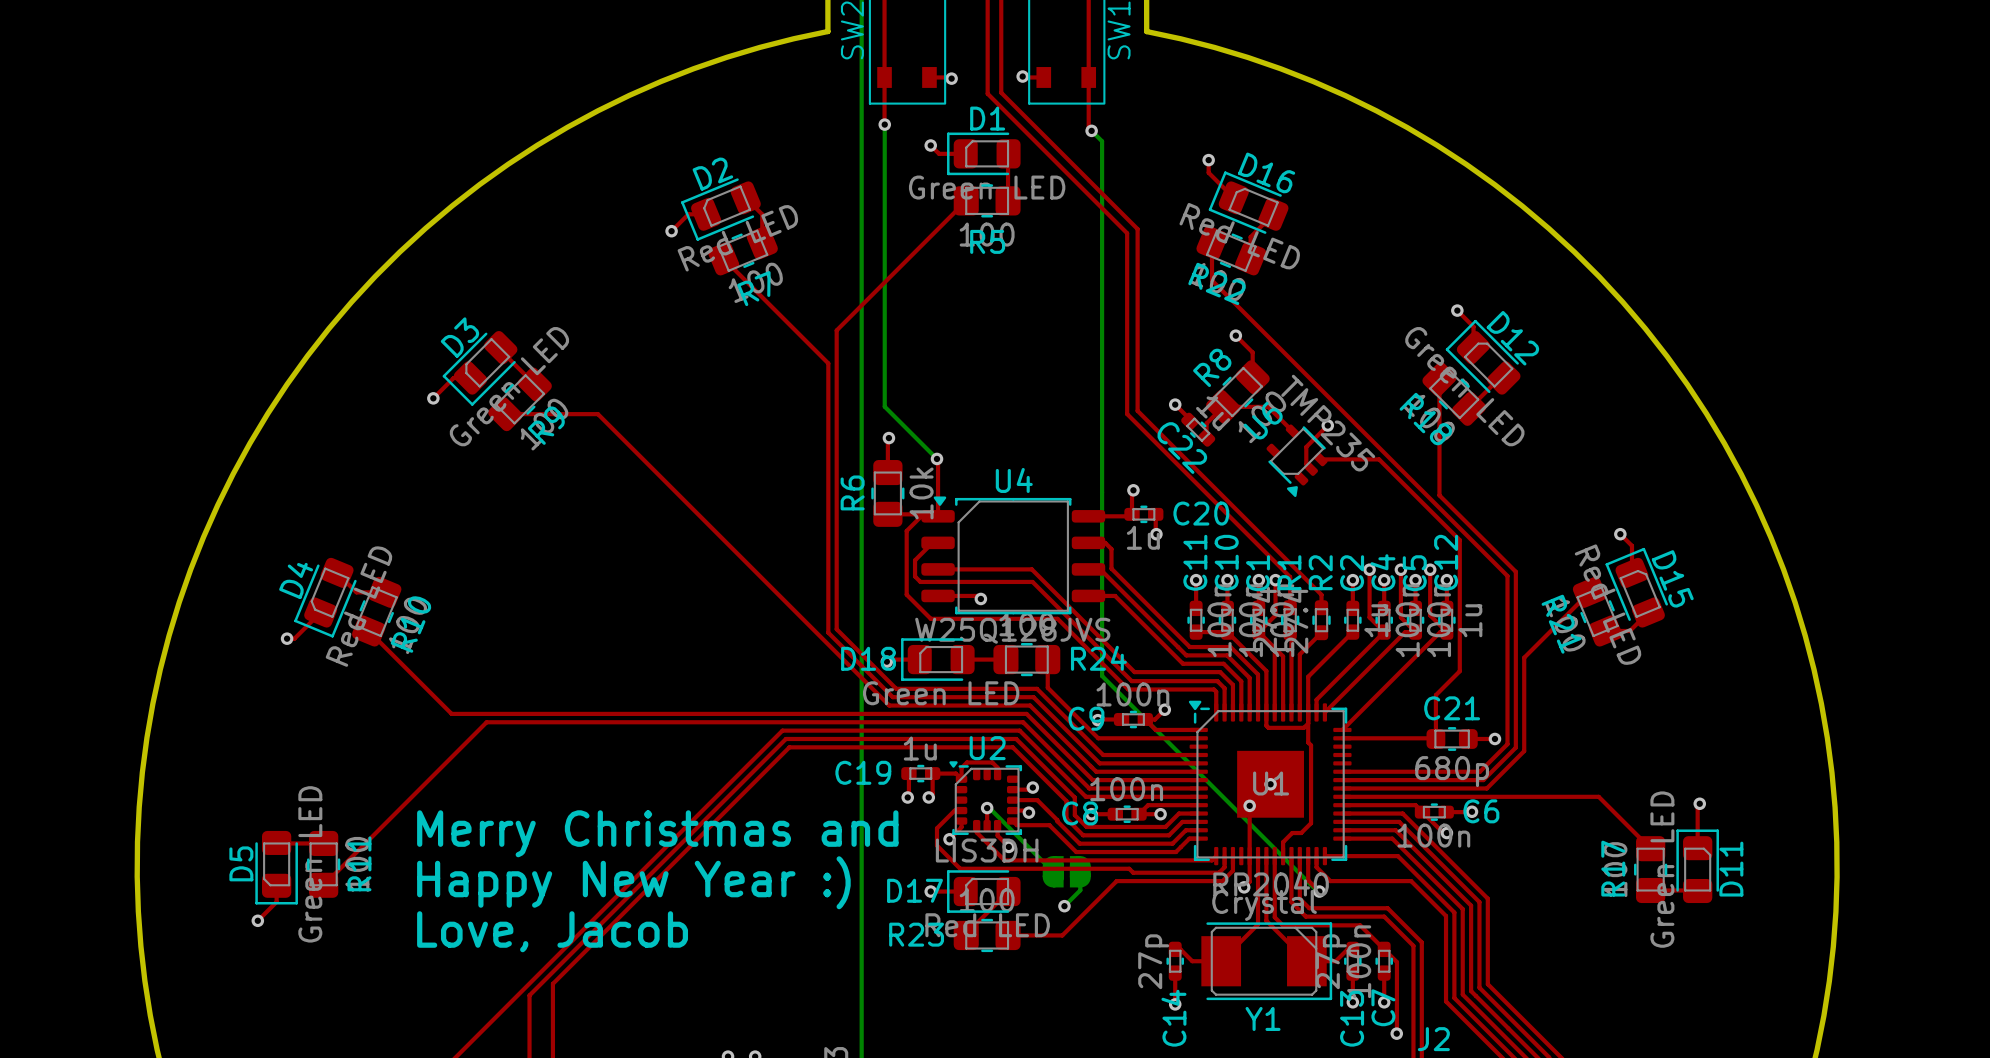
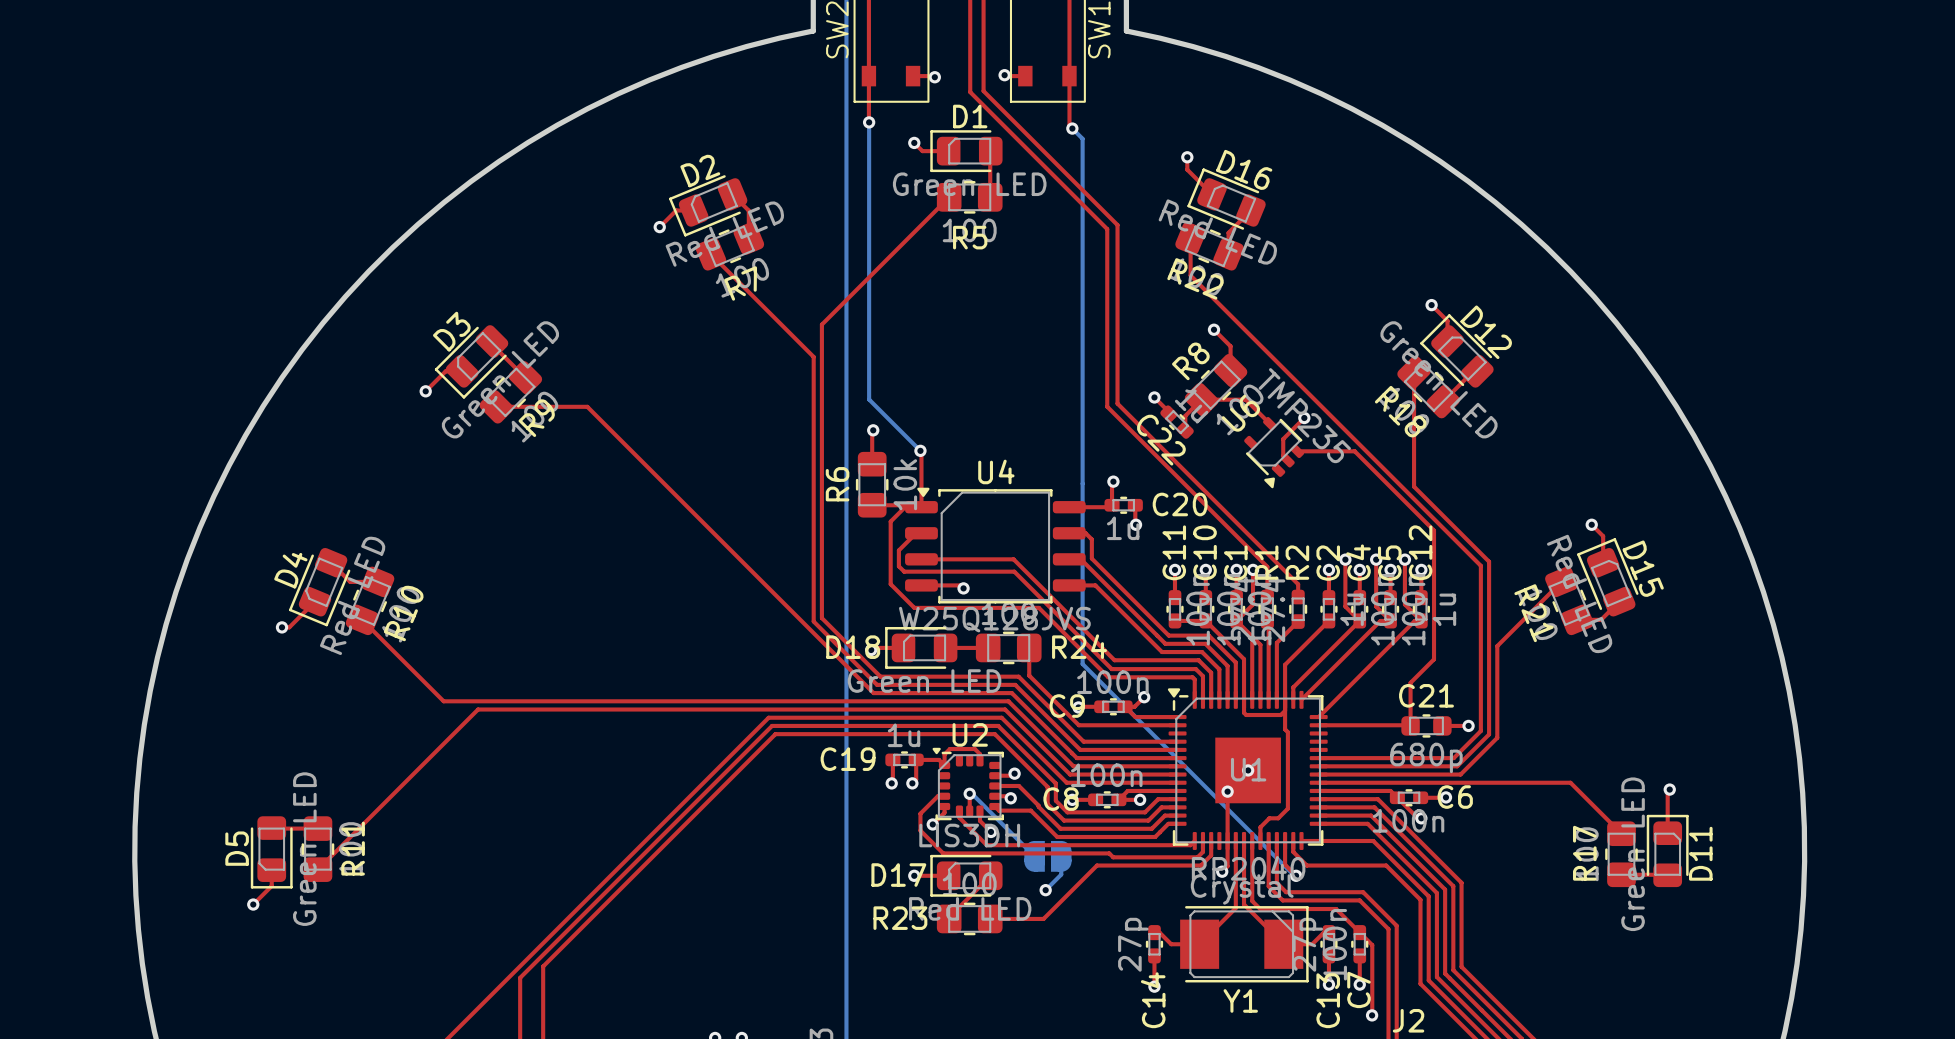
text: Merry Christmas and (657, 833) -> none
text: Happy New Year :) (633, 882) -> none
text: Love, Jacob (552, 931) -> none

